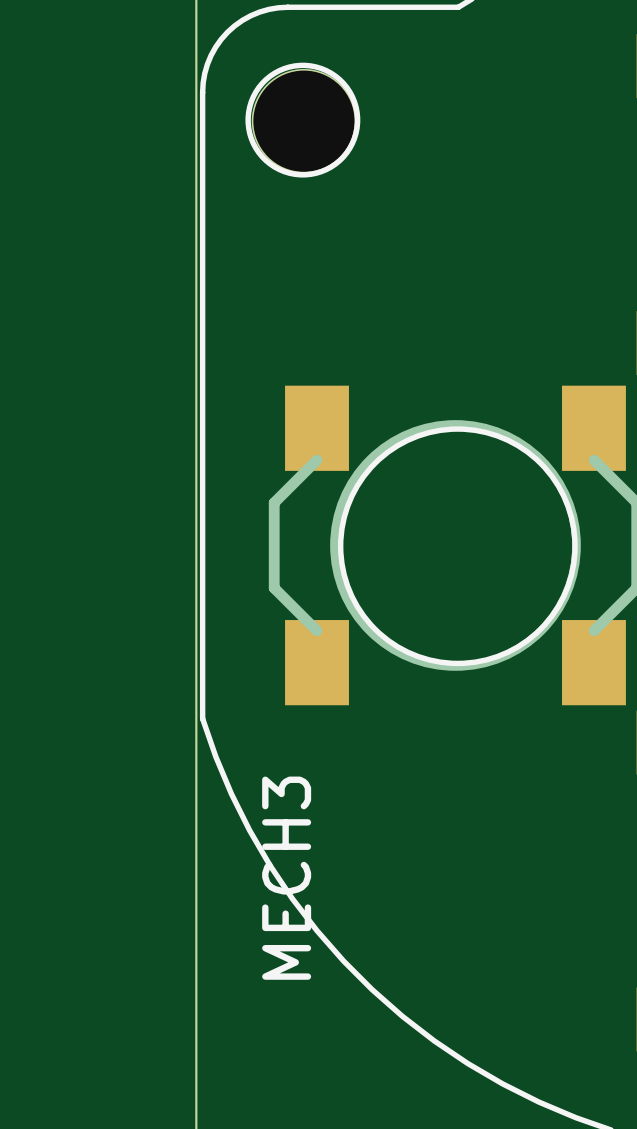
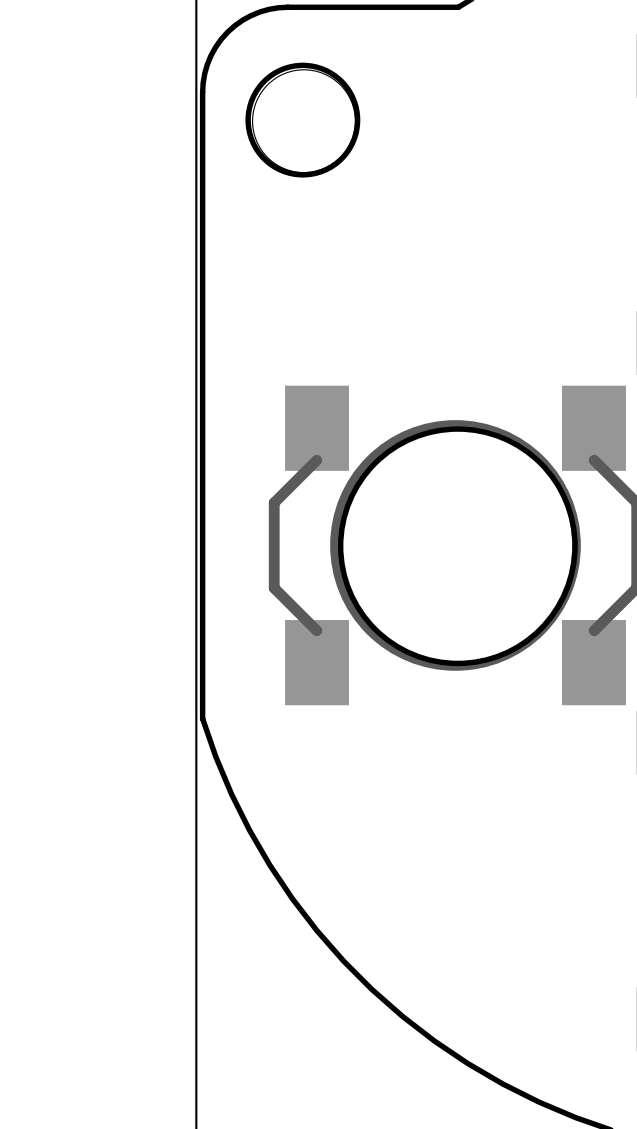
MECH3 name: MECH3 (286, 878) -> none

